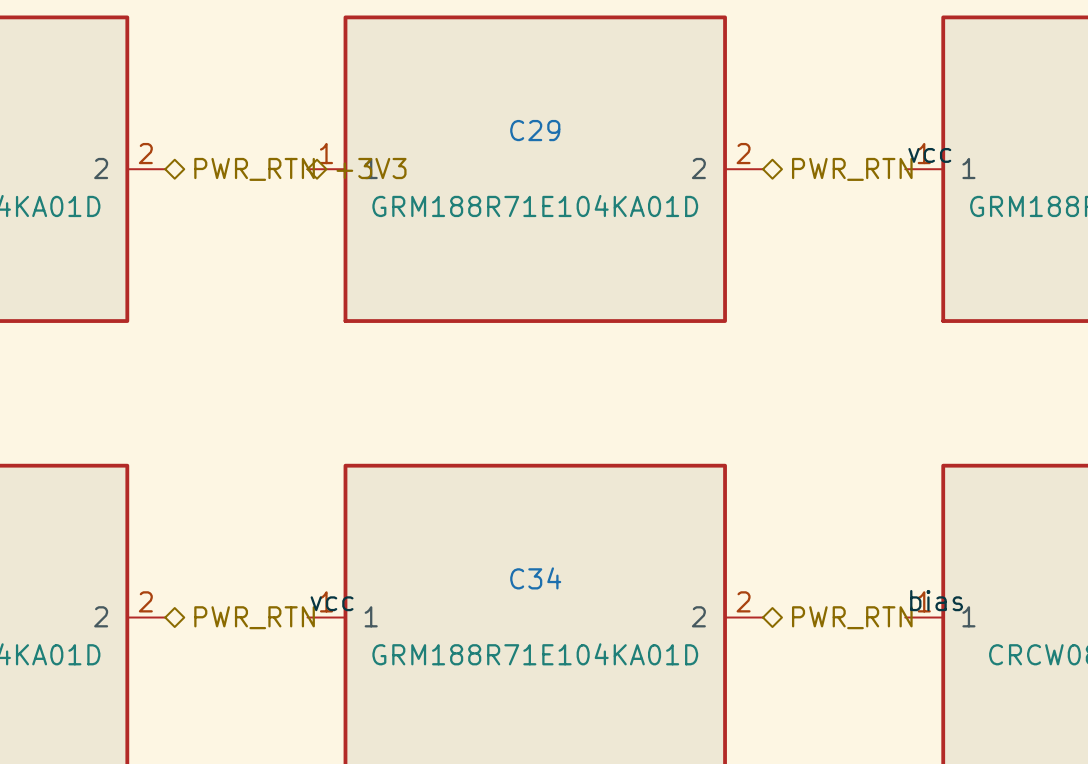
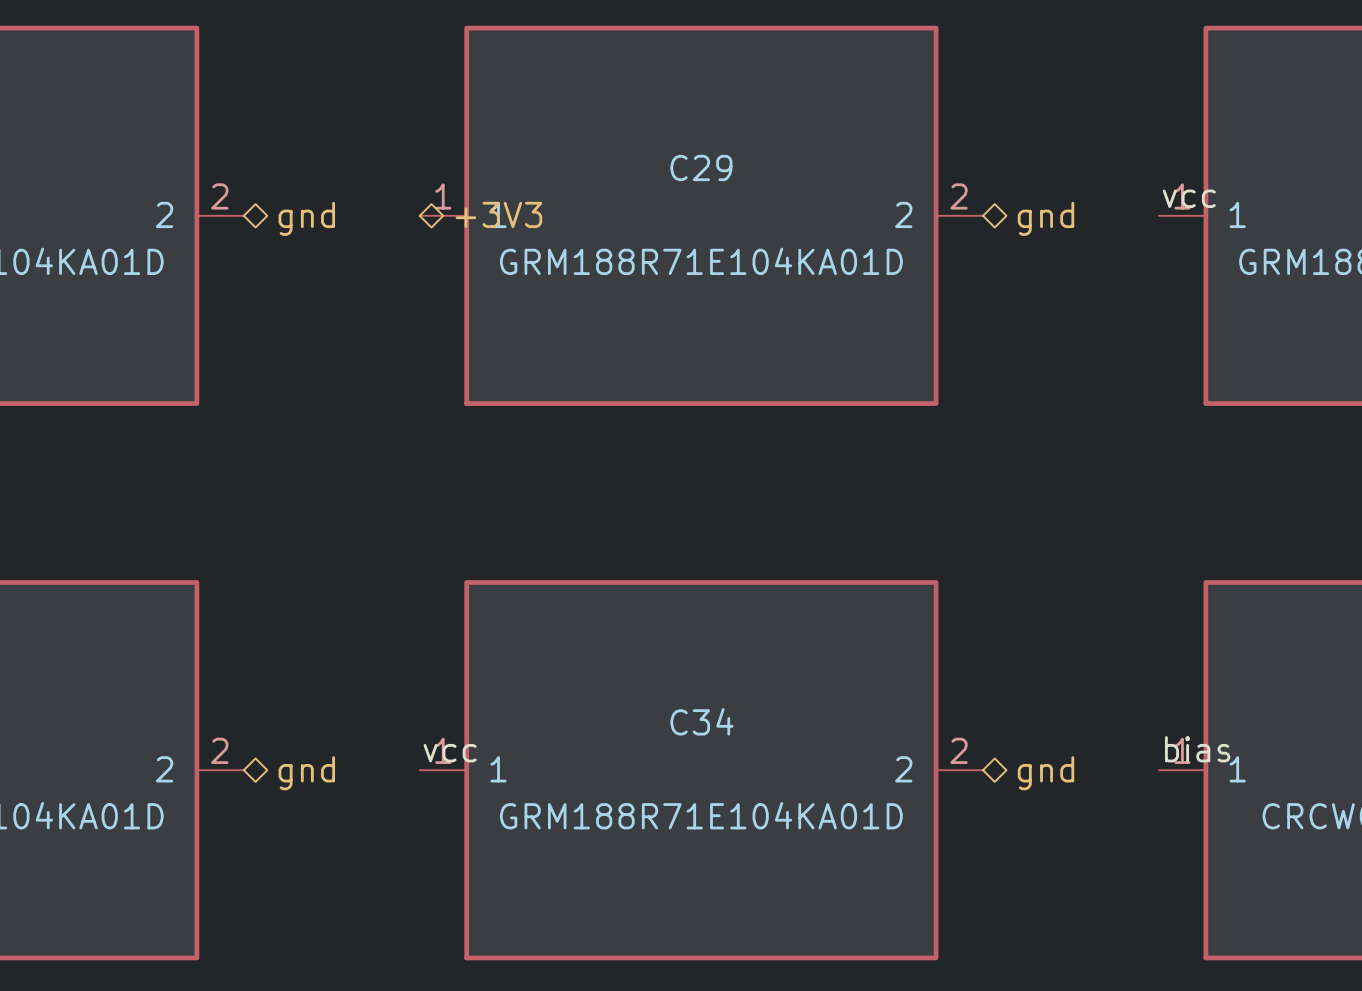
hierarchical label: PWR_RTN (254, 169) -> gnd (306, 218)
hierarchical label: PWR_RTN (852, 169) -> gnd (1045, 218)
hierarchical label: PWR_RTN (254, 617) -> gnd (306, 773)
hierarchical label: PWR_RTN (852, 617) -> gnd (1045, 773)

